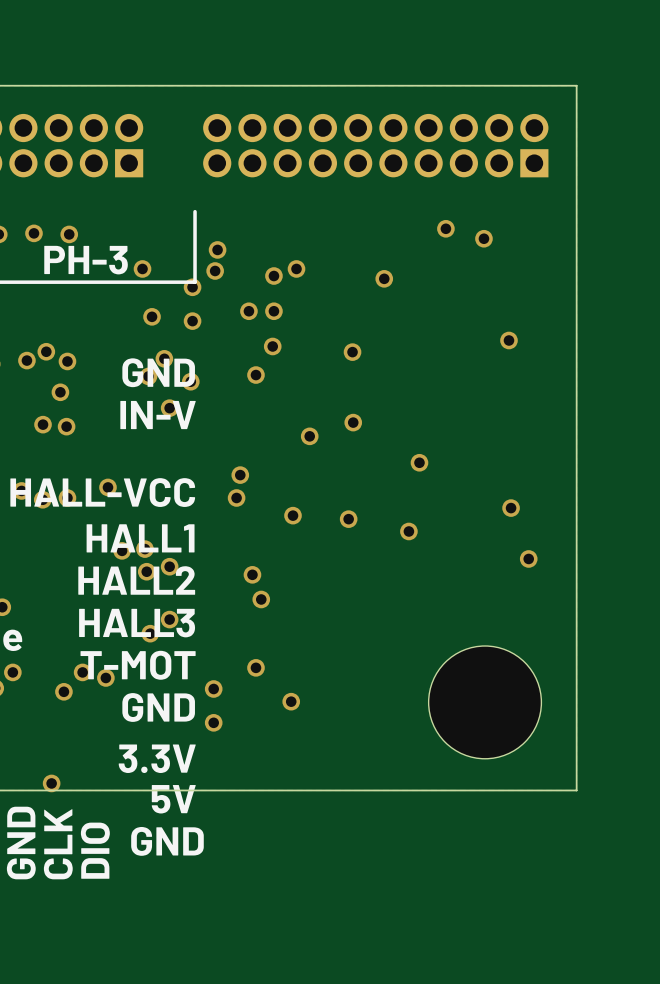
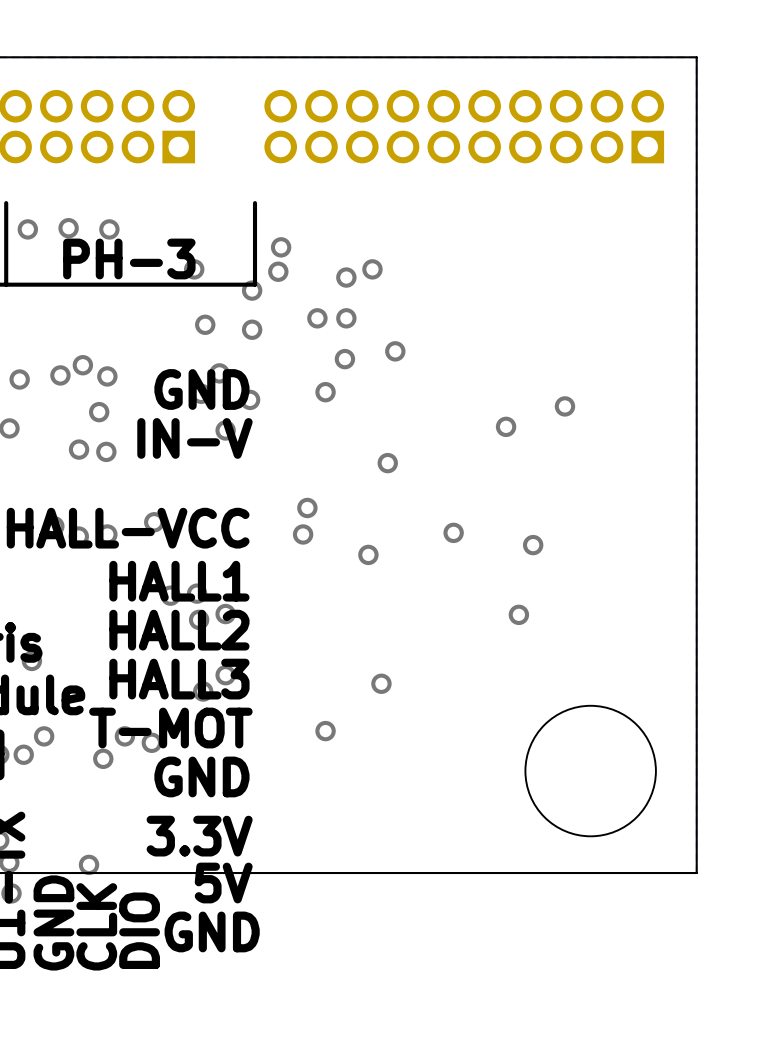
via: (445, 228) -> none
via: (483, 238) -> none
via: (384, 278) -> none
via: (508, 340) -> none
via position: (352, 352) -> (395, 351)
via: none -> (564, 406)
via: none -> (506, 426)
via: (353, 422) -> none
via: (419, 462) -> none
via: none -> (453, 532)
via: none -> (533, 545)
via: (511, 508) -> none
via: (348, 519) -> none
via: (408, 531) -> none
via: (528, 558) -> none
via: none -> (518, 614)
via: (252, 574) -> none
via: (261, 599) -> none
via: none -> (381, 683)
via: (213, 688) -> none
via: (291, 701) -> none
via: (213, 722) -> none

